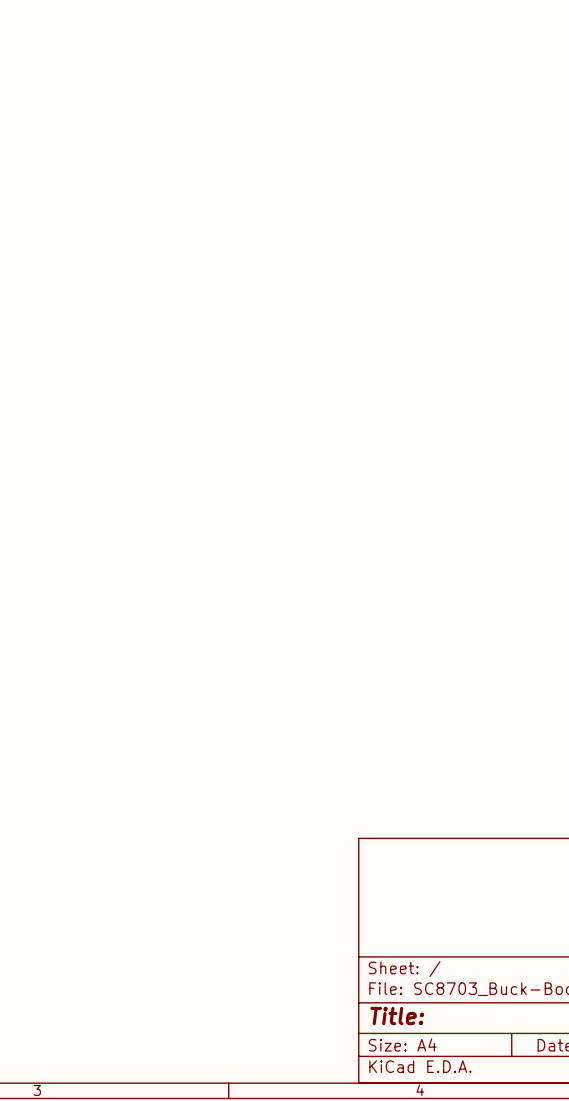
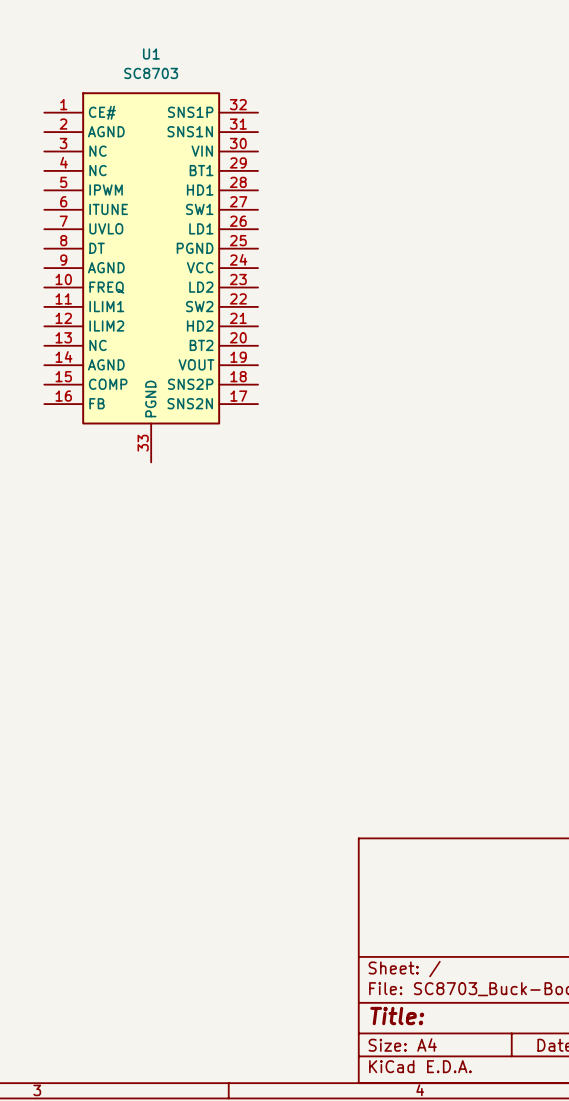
U1: none -> SC8703 (151, 277)

